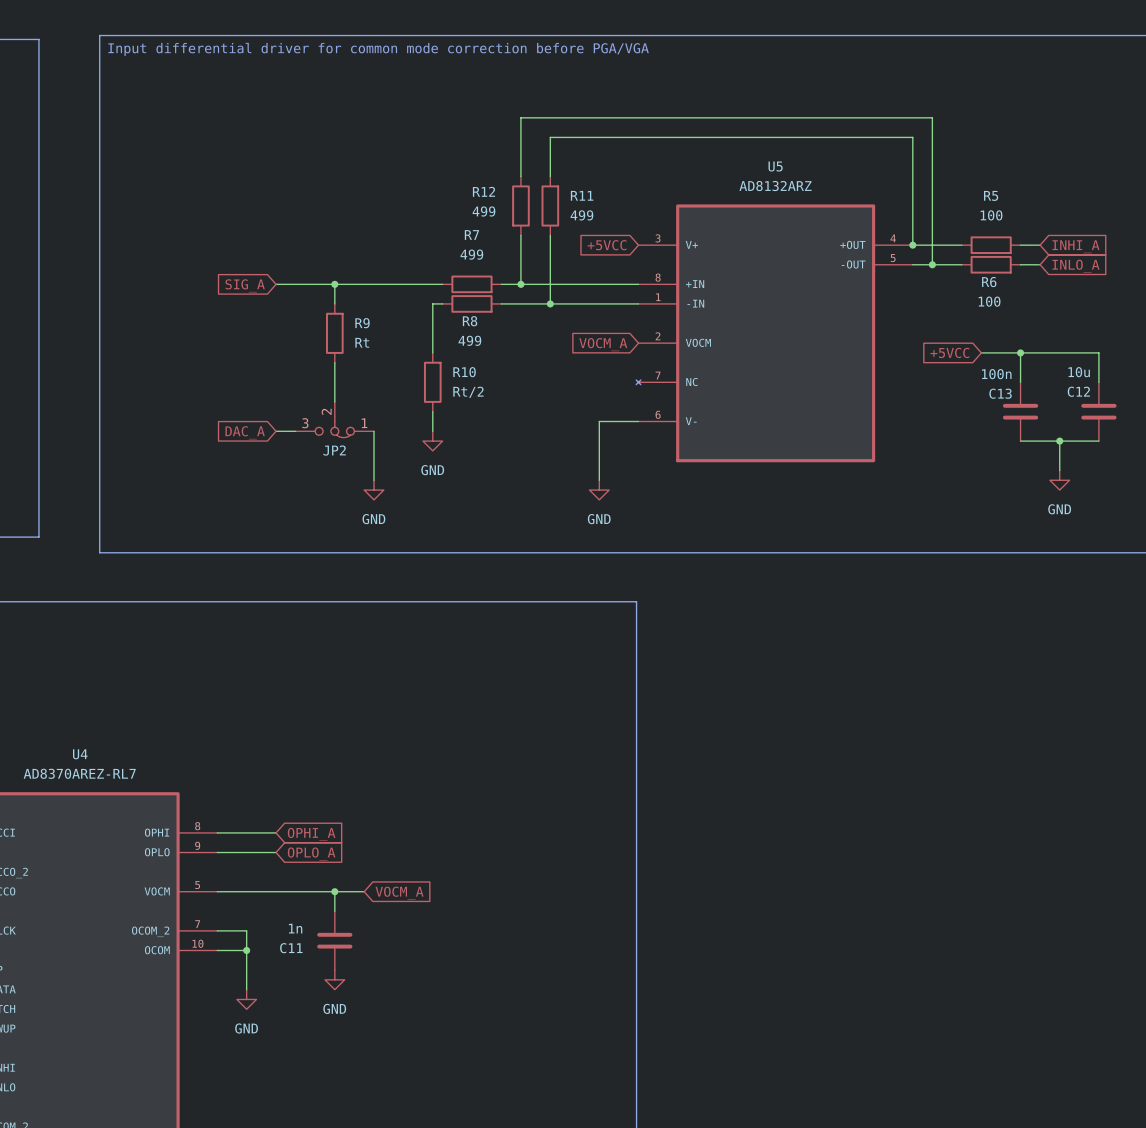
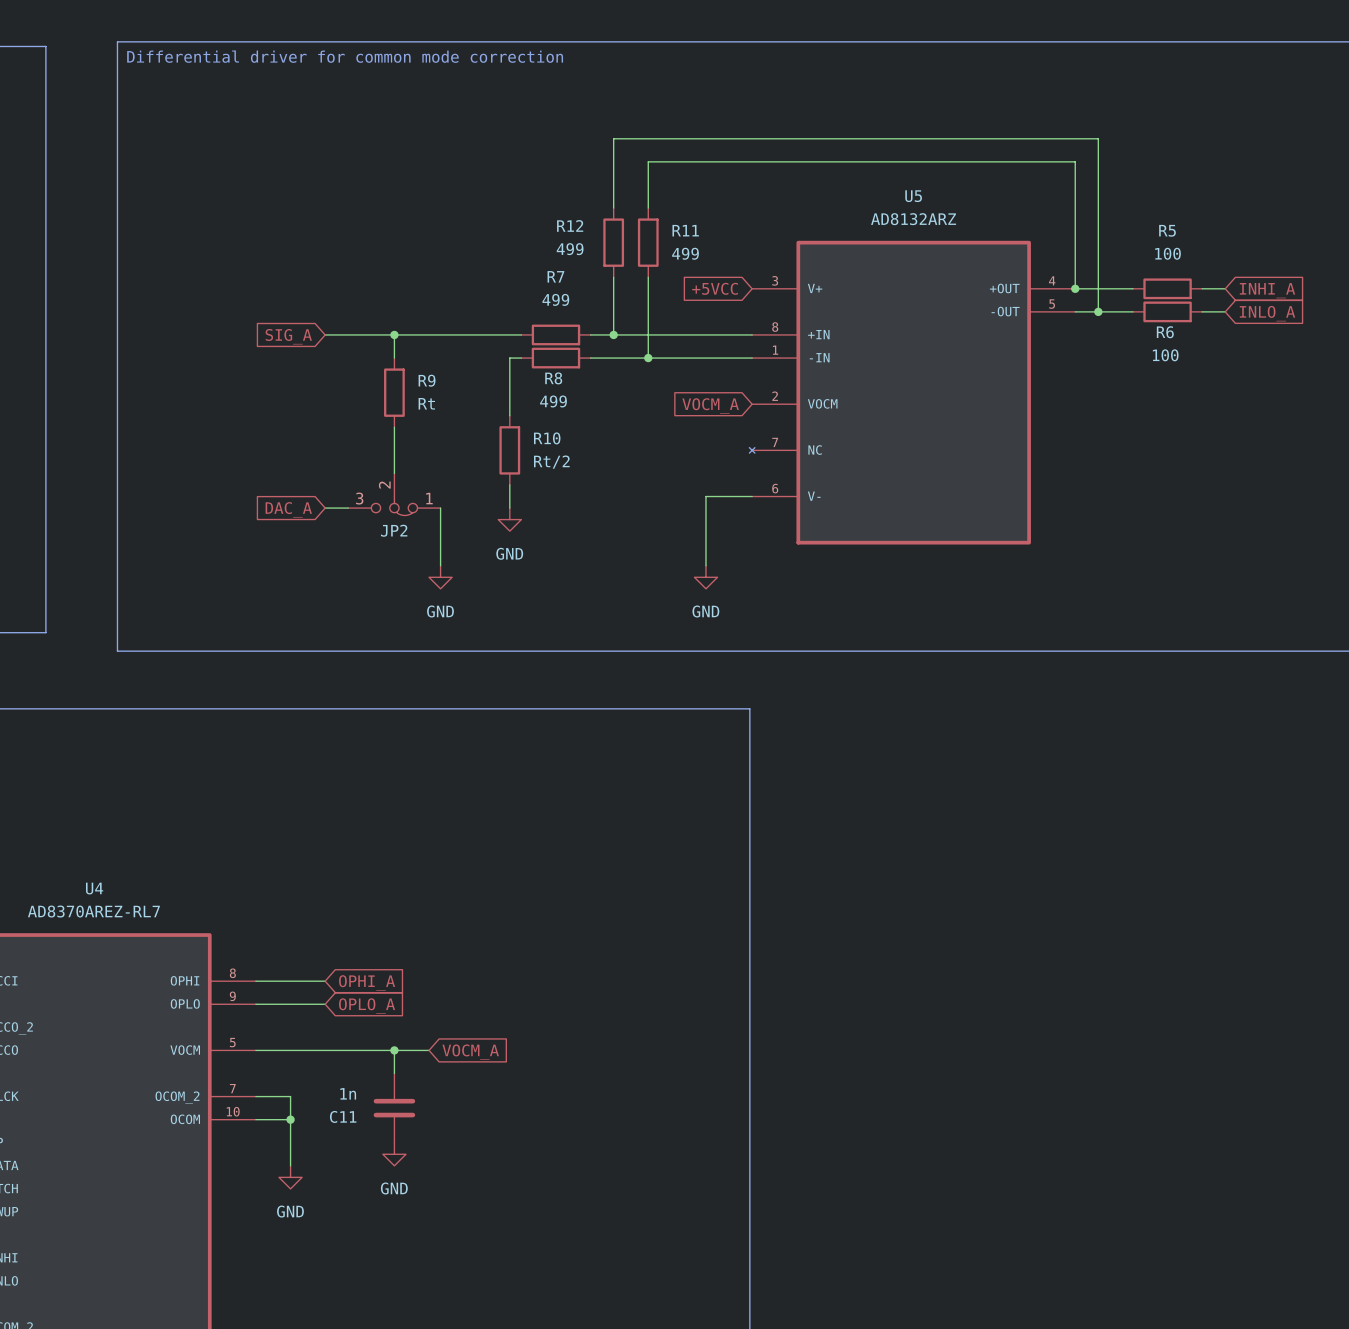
text: Input differential driver for common mode correction before PGA/VGA (378, 49) -> Differential driver for common mode correction (345, 56)
global label: +5VCC (949, 352) -> none
wire: (981, 352) (1098, 352) (1098, 382) -> none
wire: (1020, 352) (1020, 382) -> none
junction: (1020, 352) -> none
C13: 100n (1020, 411) -> none
C12: 10u (1098, 411) -> none
wire: (1020, 441) (1098, 441) -> none
wire: (1059, 441) (1059, 470) -> none
junction: (1059, 441) -> none
power symbol: GND (1059, 480) -> none

